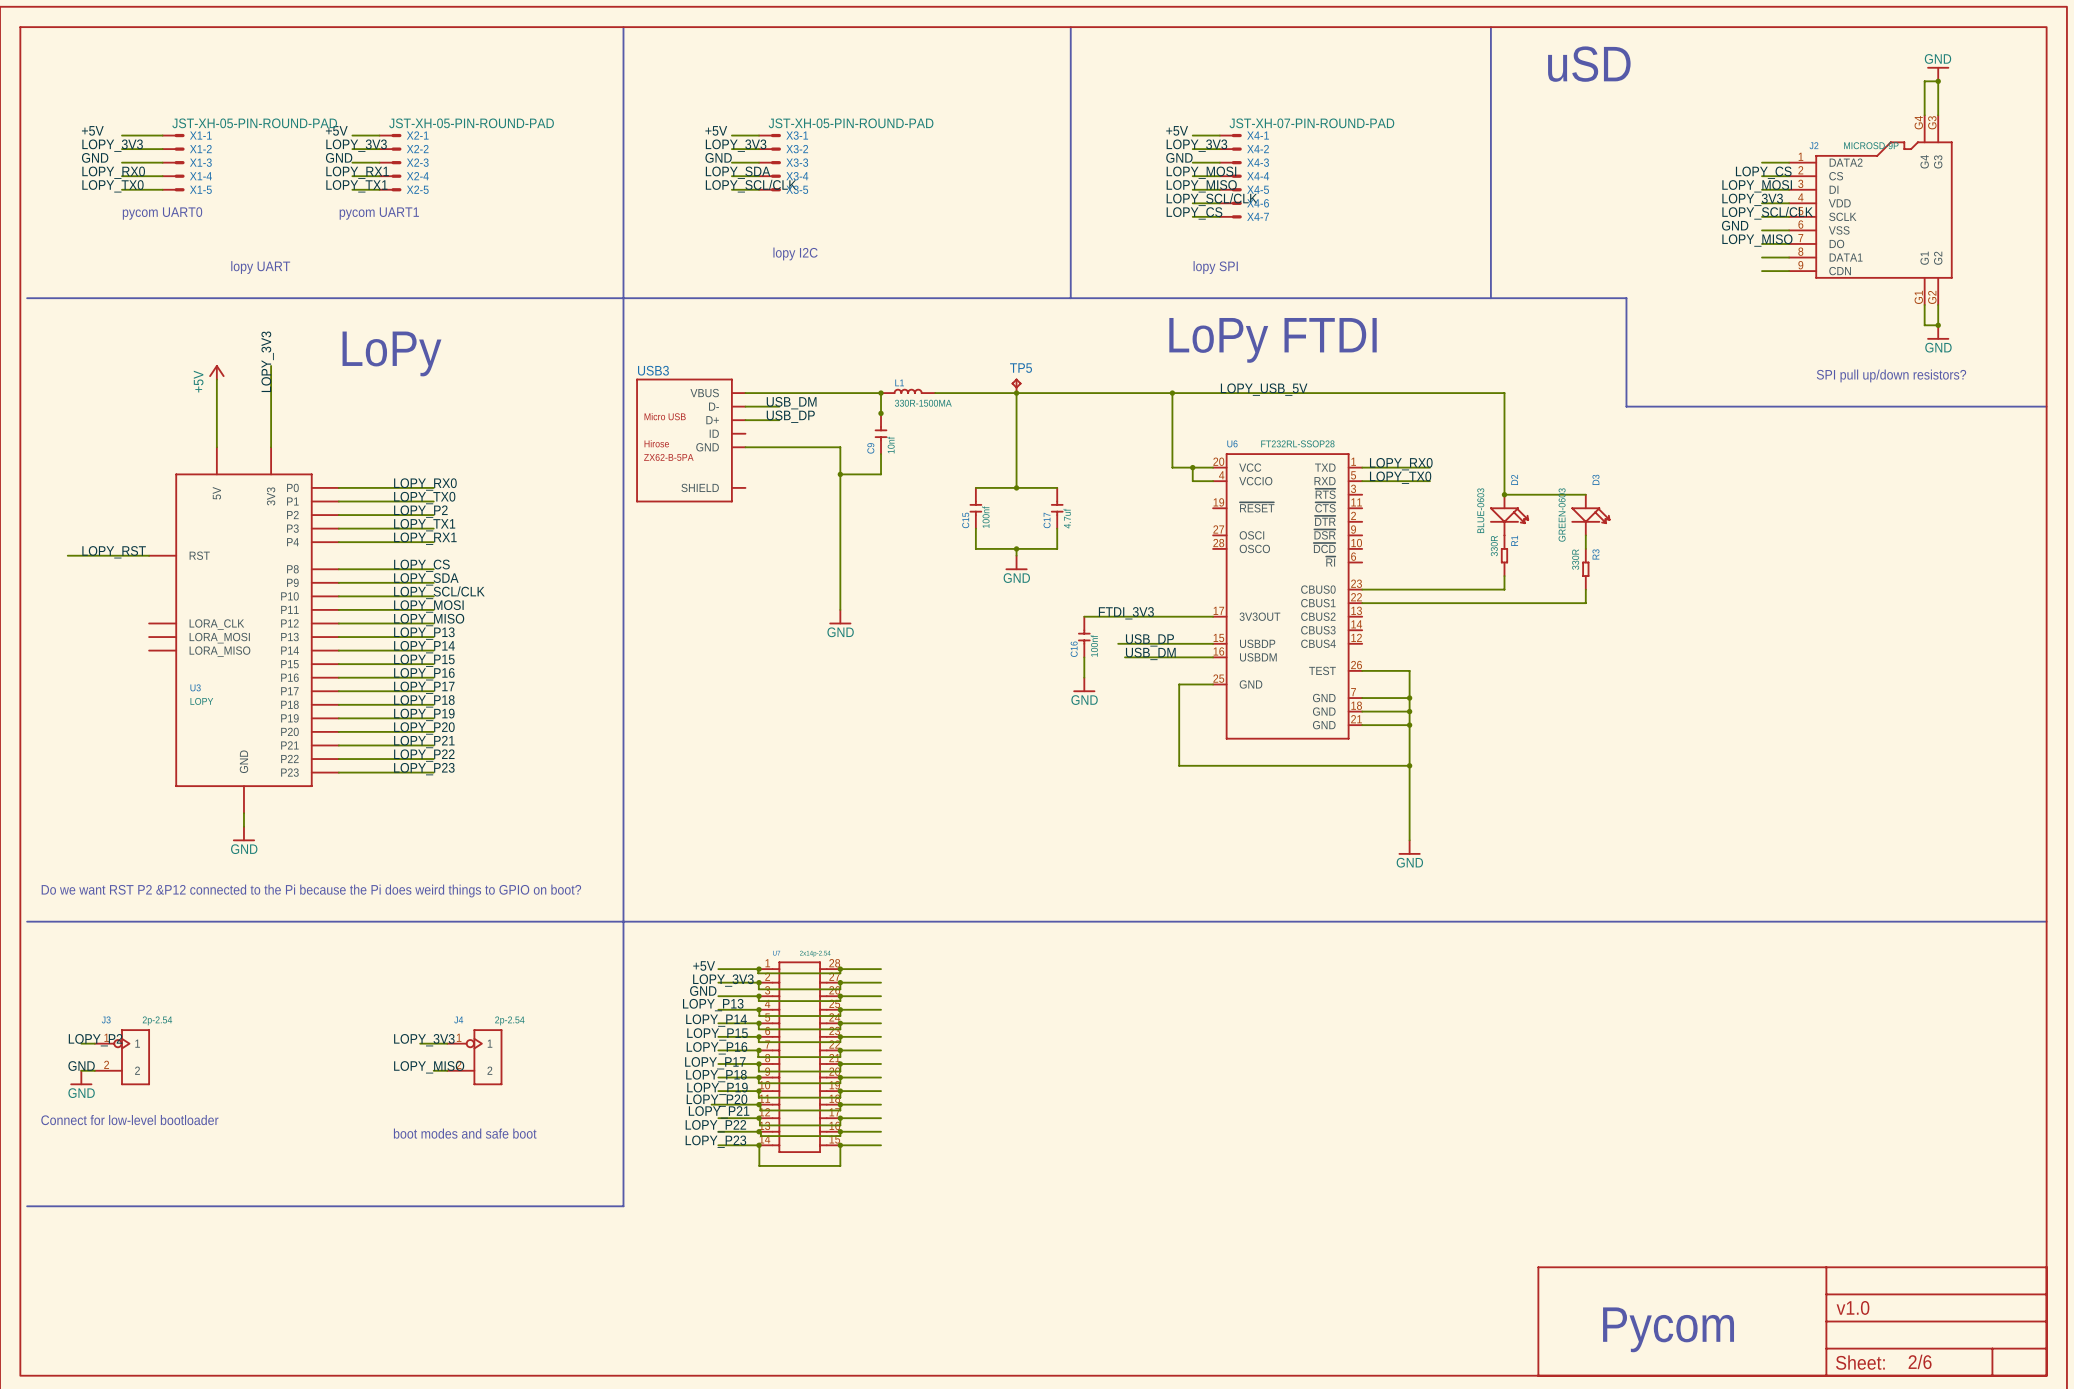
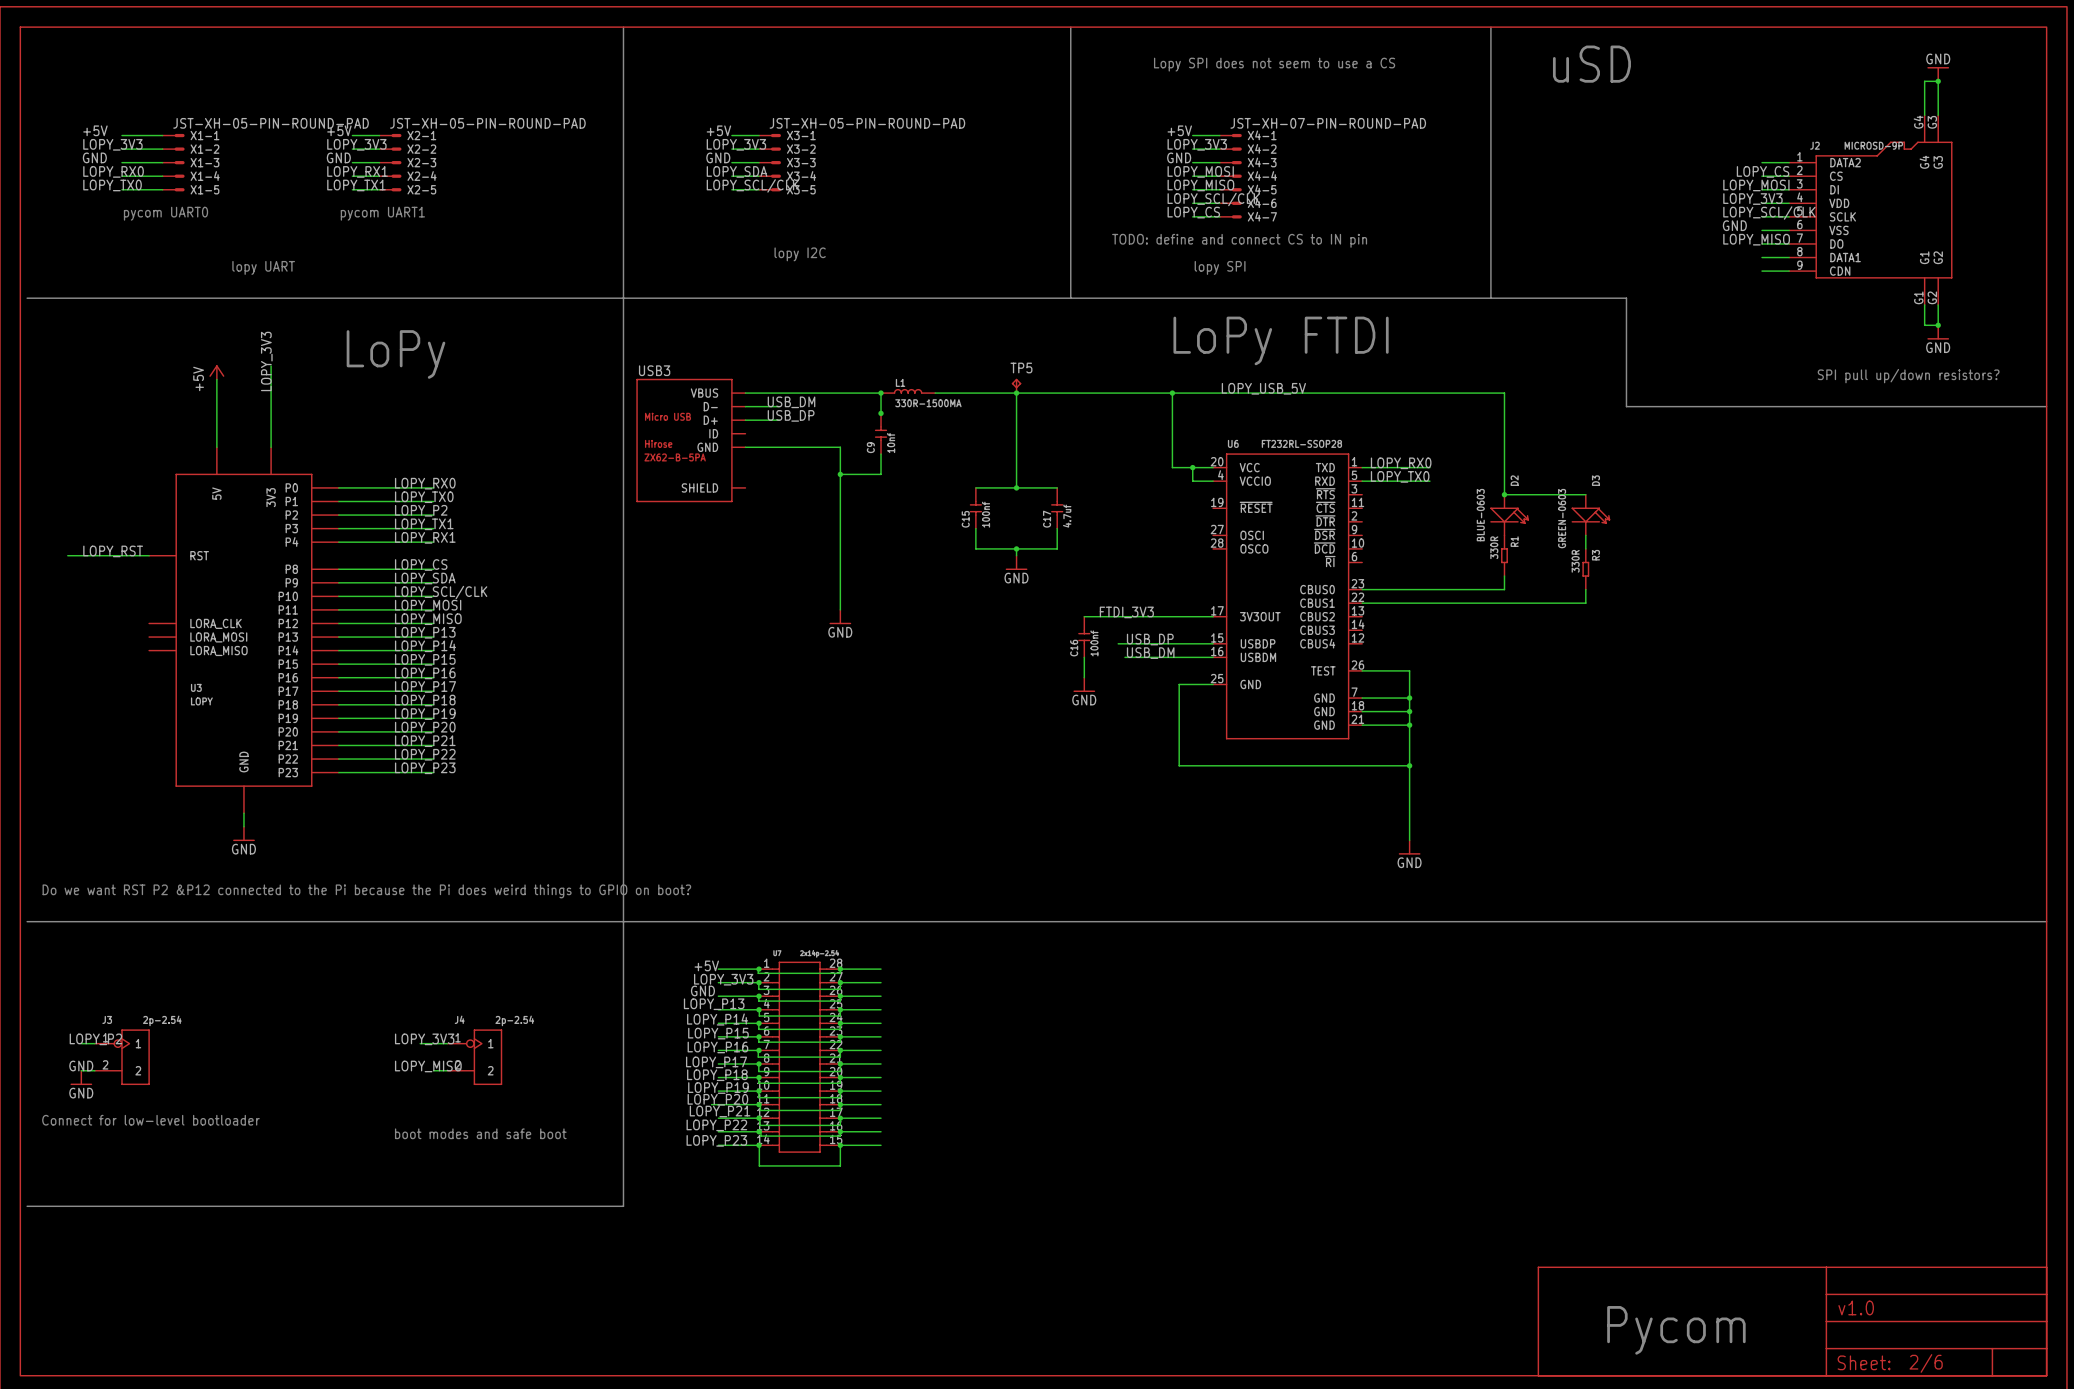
text: none -> Lopy SPI does not seem to use a CS (1274, 64)
text: none -> TODO: define and connect CS to IN pin (1239, 240)

